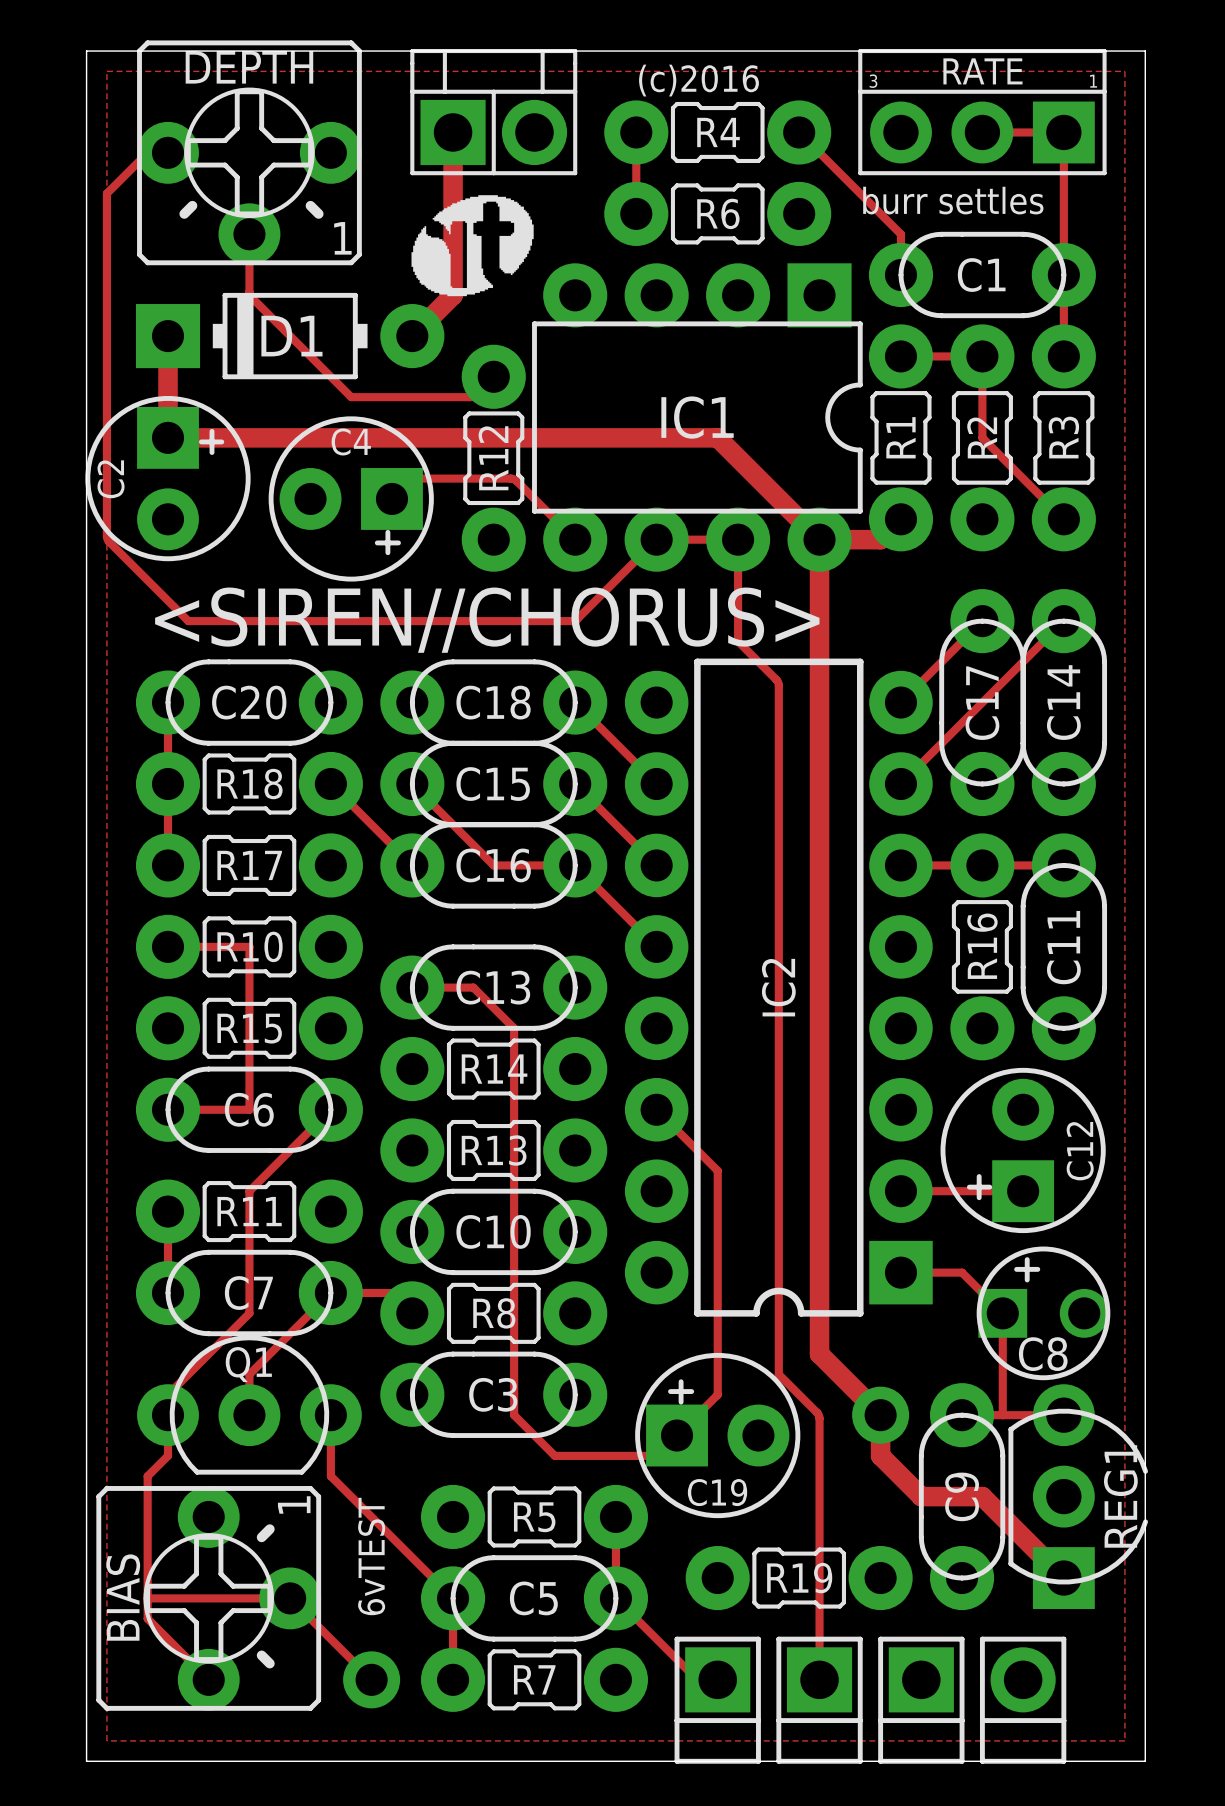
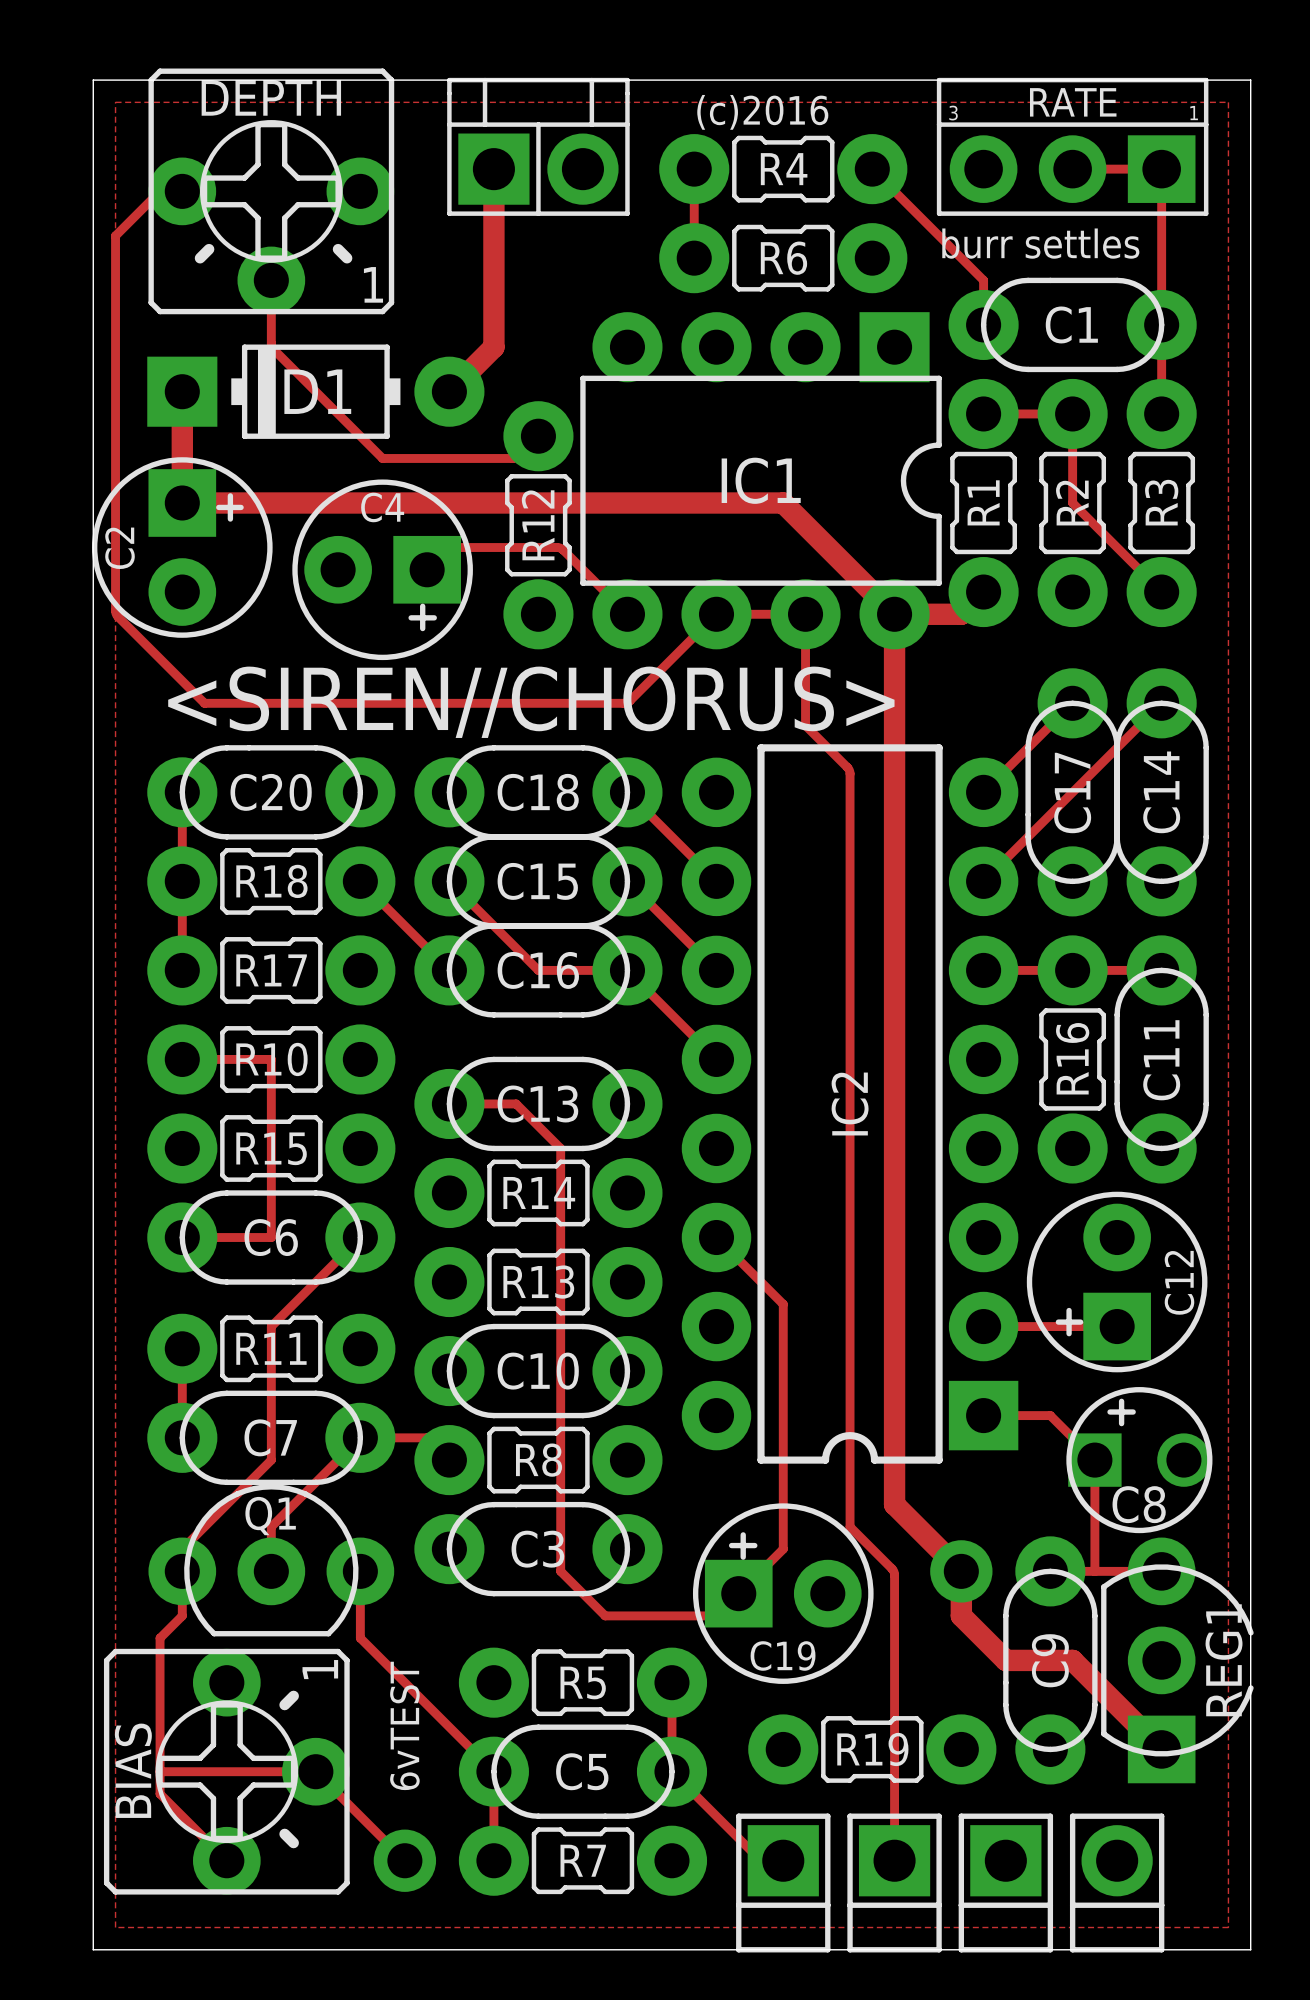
drawing: [411, 195, 534, 297] -> none

